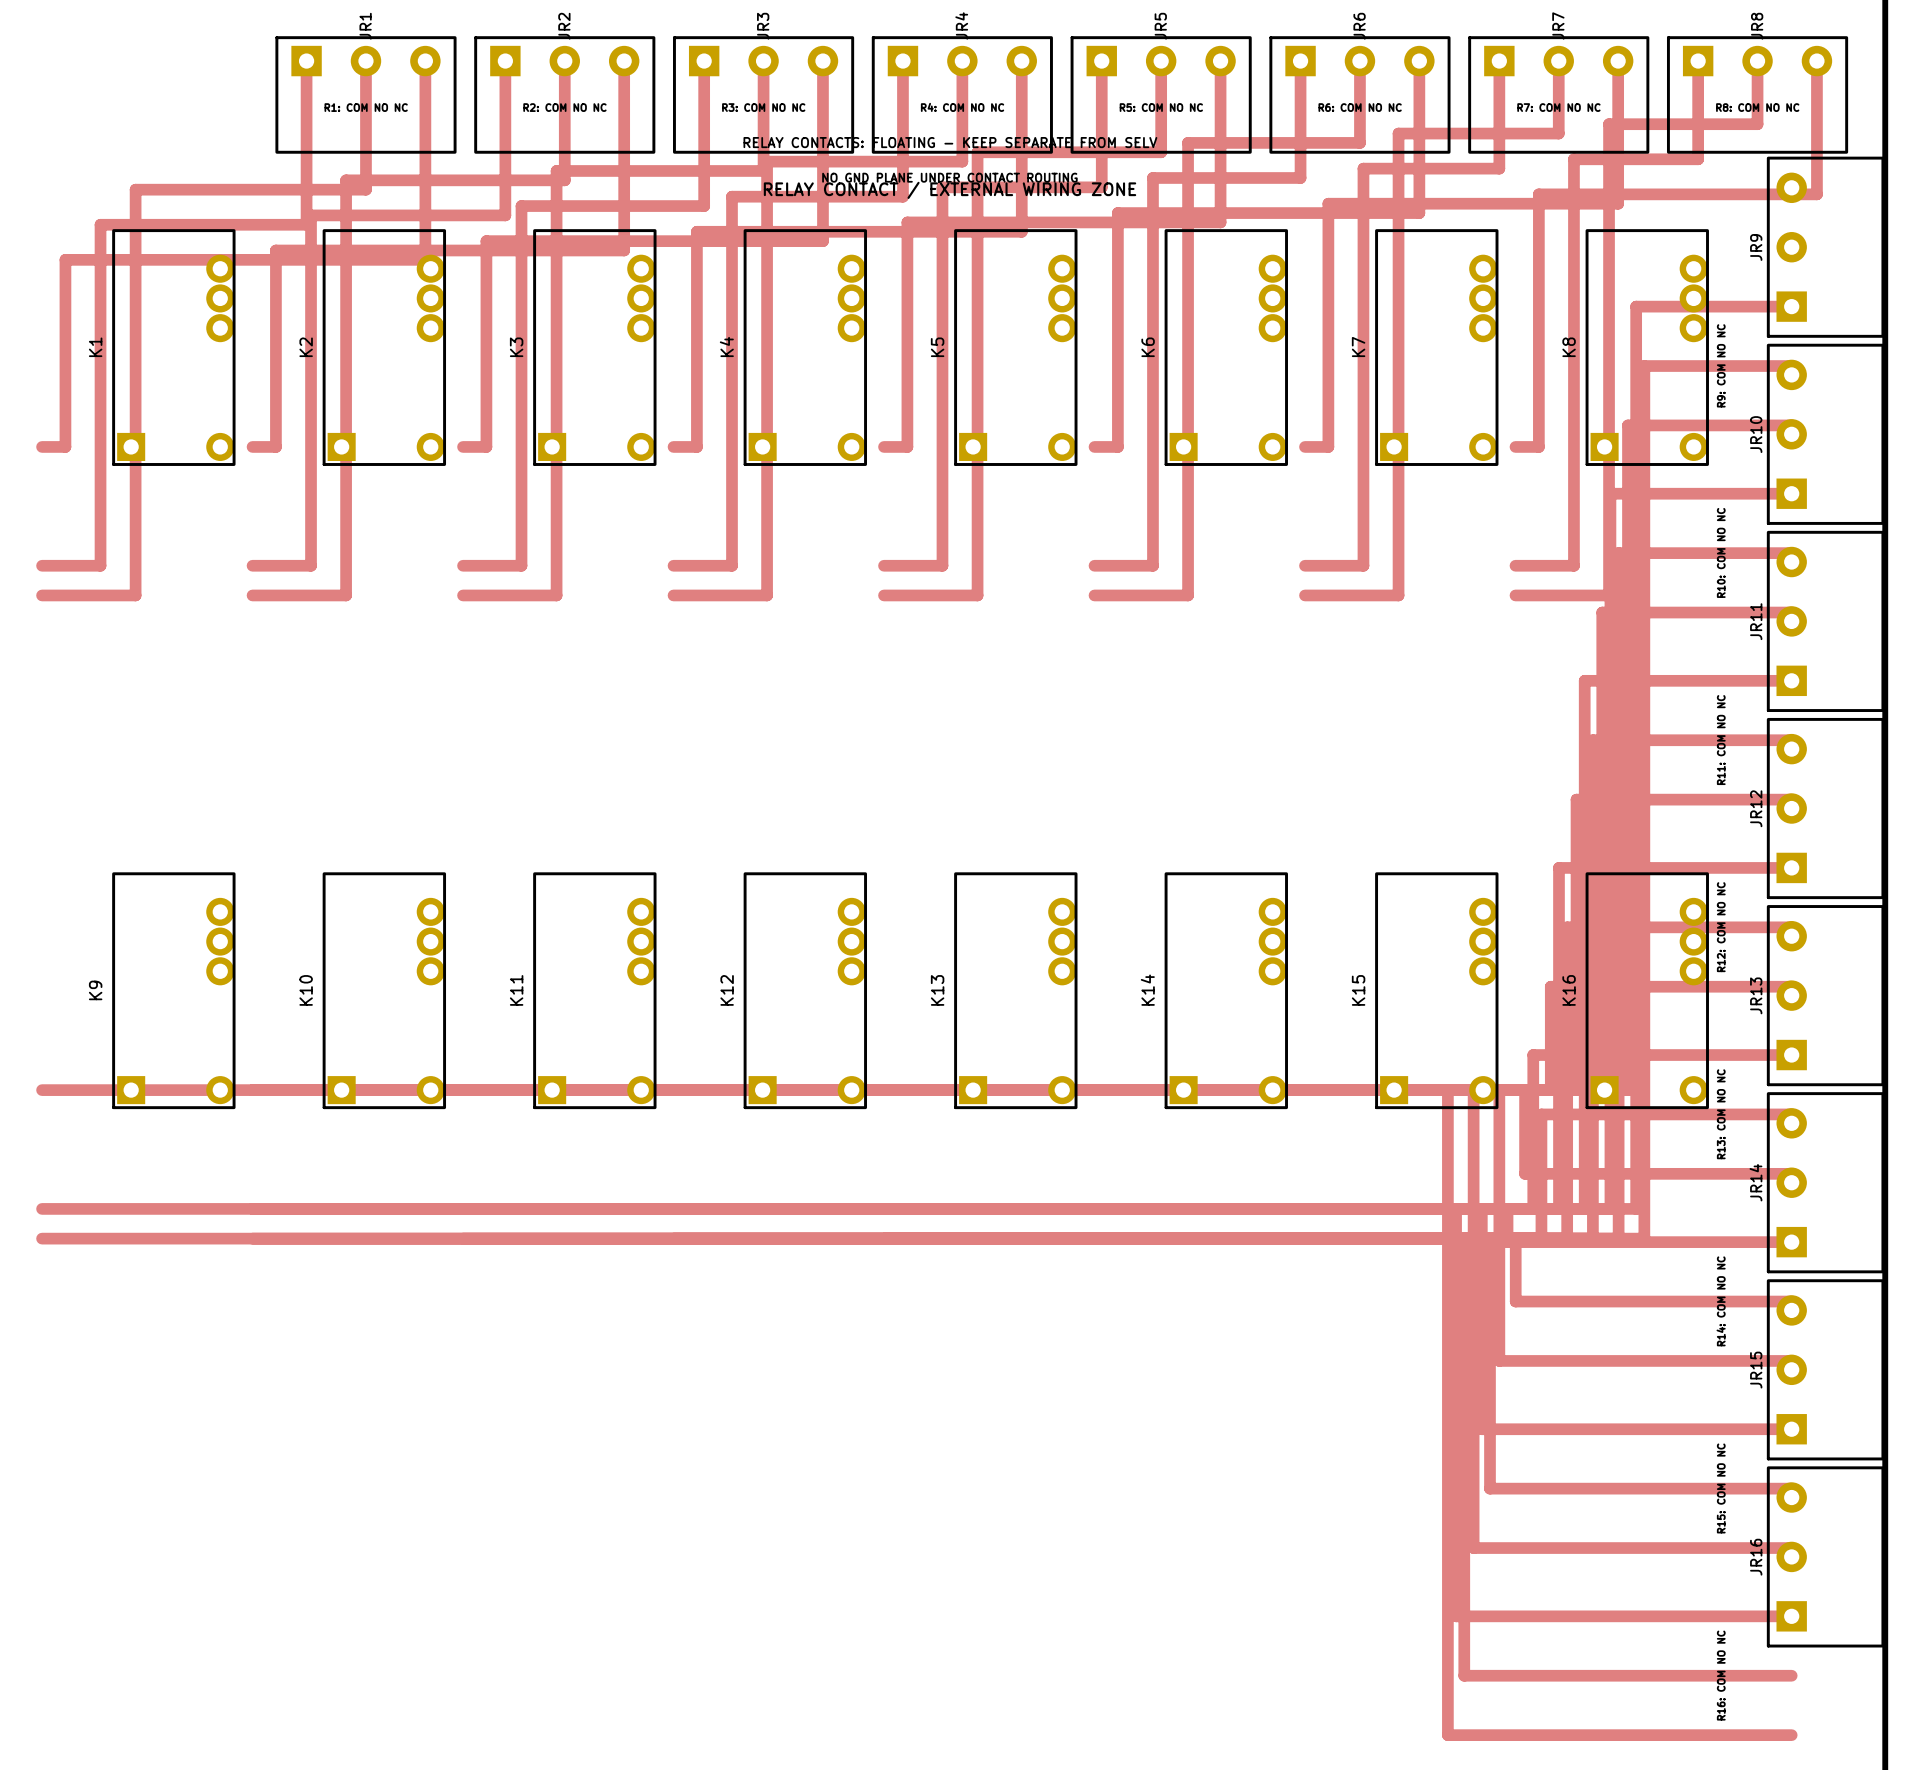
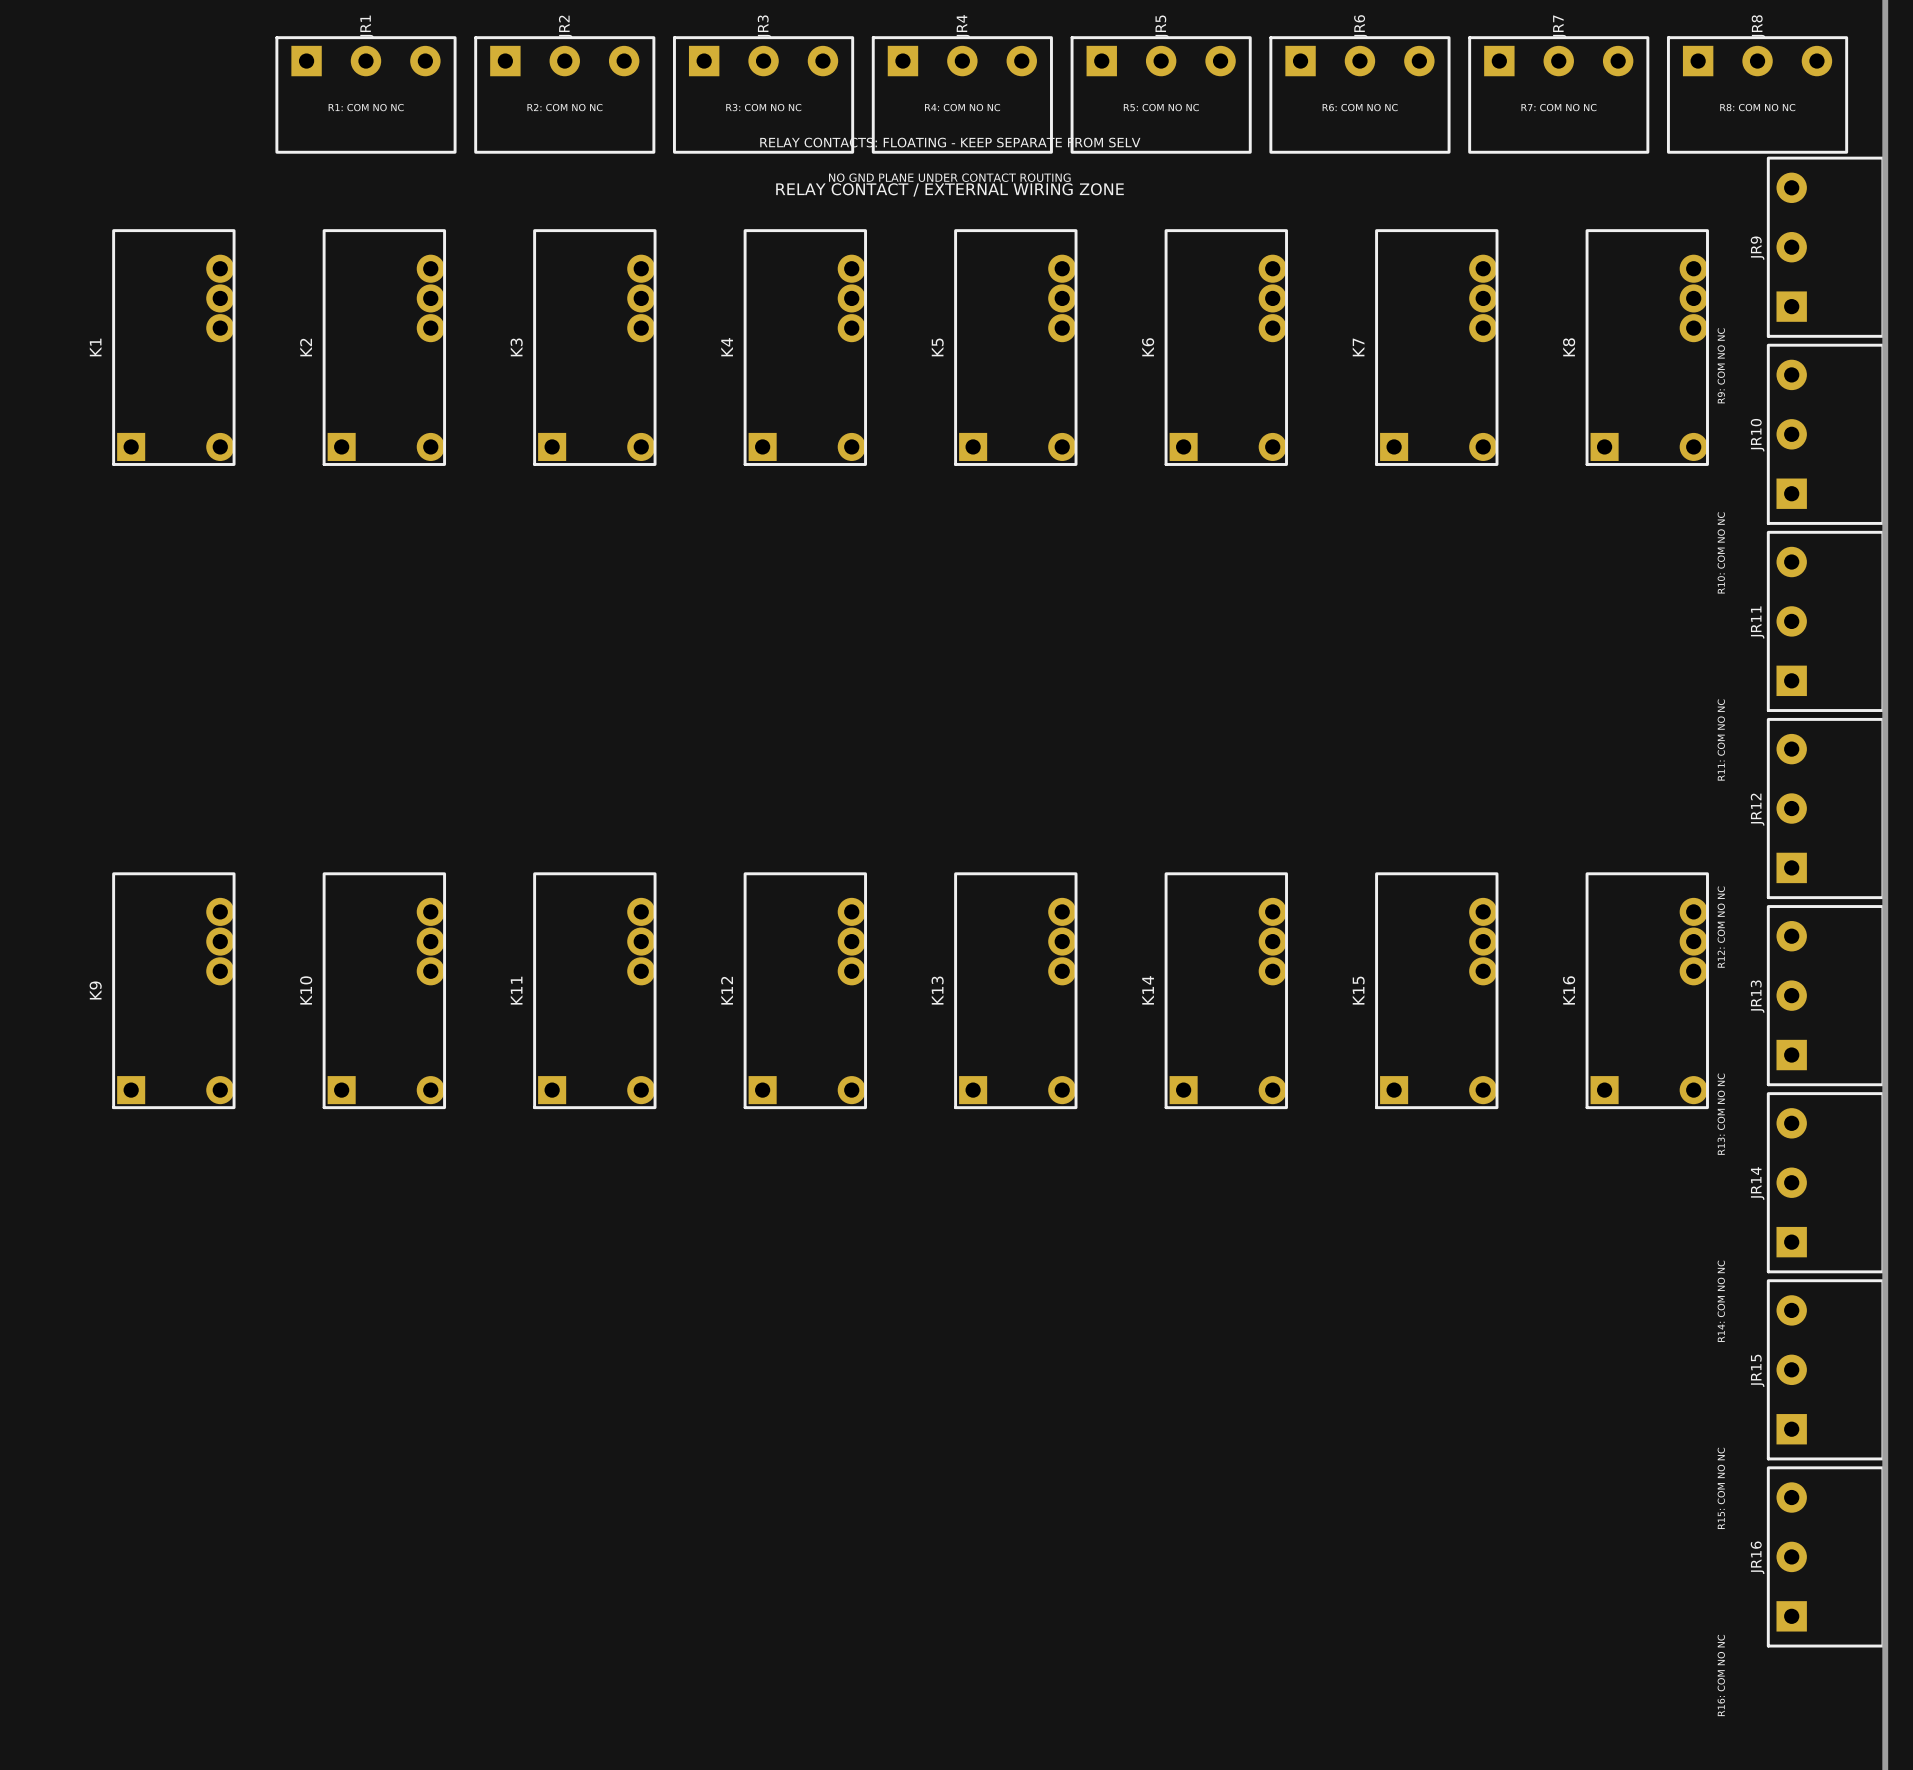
track: (306, 61) (306, 224) (100, 224) (100, 565) (42, 565) -> none
track: (365, 61) (365, 189) (135, 189) (135, 595) (42, 595) -> none
track: (425, 61) (425, 259) (65, 259) (65, 446) (42, 446) -> none
track: (505, 61) (505, 215) (311, 215) (311, 565) (252, 565) -> none
track: (564, 61) (564, 180) (346, 180) (346, 595) (252, 595) -> none
track: (624, 61) (624, 250) (275, 250) (275, 446) (252, 446) -> none
track: (704, 61) (704, 206) (521, 206) (521, 565) (463, 565) -> none
track: (763, 61) (763, 170) (556, 170) (556, 595) (463, 595) -> none
track: (822, 61) (822, 241) (486, 241) (486, 446) (463, 446) -> none
track: (902, 61) (902, 196) (731, 196) (731, 565) (673, 565) -> none
track: (962, 61) (962, 161) (767, 161) (767, 595) (673, 595) -> none
track: (1021, 61) (1021, 231) (696, 231) (696, 446) (673, 446) -> none
track: (1101, 61) (1101, 187) (942, 187) (942, 565) (884, 565) -> none
track: (1161, 61) (1161, 152) (977, 152) (977, 595) (884, 595) -> none
track: (1220, 61) (1220, 222) (907, 222) (907, 446) (884, 446) -> none
track: (1300, 61) (1300, 177) (1152, 177) (1152, 565) (1094, 565) -> none
track: (1359, 61) (1359, 142) (1188, 142) (1188, 595) (1094, 595) -> none
track: (1419, 61) (1419, 213) (1117, 213) (1117, 446) (1094, 446) -> none
track: (1499, 61) (1499, 168) (1363, 168) (1363, 565) (1304, 565) -> none
track: (1558, 61) (1558, 133) (1398, 133) (1398, 595) (1304, 595) -> none
track: (1618, 61) (1618, 203) (1328, 203) (1328, 446) (1304, 446) -> none
track: (1698, 61) (1698, 159) (1573, 159) (1573, 565) (1515, 565) -> none
track: (1757, 61) (1757, 124) (1609, 124) (1609, 595) (1515, 595) -> none
track: (1816, 61) (1816, 194) (1538, 194) (1538, 446) (1515, 446) -> none
track: (1791, 306) (1636, 306) (1636, 1208) (42, 1208) -> none
track: (1791, 366) (1644, 366) (1644, 1238) (42, 1238) -> none
track: (1791, 425) (1627, 425) (1627, 1090) (42, 1090) -> none
track: (1791, 493) (1610, 493) (1610, 1208) -> none
track: (1791, 553) (1618, 553) (1618, 1238) -> none
track: (1791, 612) (1602, 612) (1602, 1090) -> none
track: (1791, 680) (1584, 680) (1584, 1208) -> none
track: (1791, 740) (1592, 740) (1592, 1238) -> none
track: (1791, 799) (1576, 799) (1576, 1090) -> none
track: (1791, 867) (1558, 867) (1558, 1208) -> none
track: (1791, 927) (1567, 927) (1567, 1238) -> none
track: (1791, 986) (1550, 986) (1550, 1090) -> none
track: (1791, 1055) (1533, 1055) (1533, 1208) -> none
track: (1447, 1090) (1447, 1735) (1791, 1735) -> none
track: (1473, 1090) (1473, 1548) (1791, 1548) -> none
track: (1499, 1090) (1499, 1360) (1791, 1360) -> none
track: (1525, 1090) (1525, 1173) (1791, 1173) -> none
track: (1791, 1114) (1541, 1114) (1541, 1238) -> none
track: (1456, 1208) (1456, 1616) (1791, 1616) -> none
track: (1481, 1208) (1481, 1429) (1791, 1429) -> none
track: (1507, 1208) (1507, 1242) (1791, 1242) -> none
track: (1464, 1238) (1464, 1675) (1791, 1675) -> none
track: (1489, 1238) (1489, 1488) (1791, 1488) -> none
track: (1515, 1238) (1515, 1301) (1791, 1301) -> none

